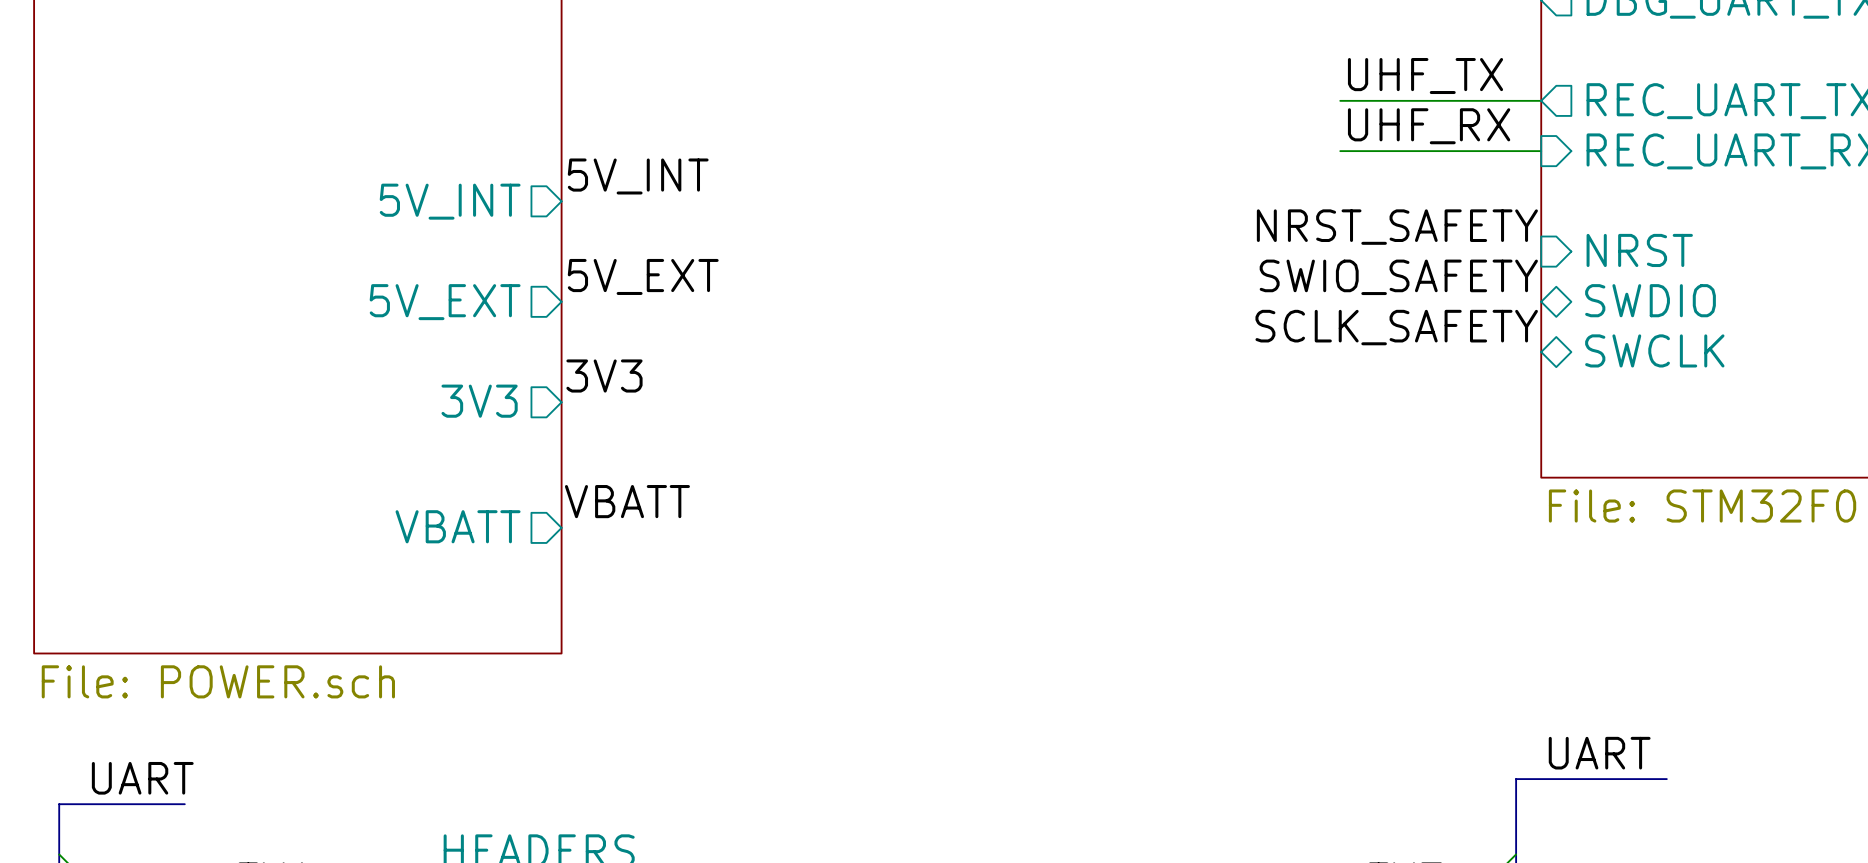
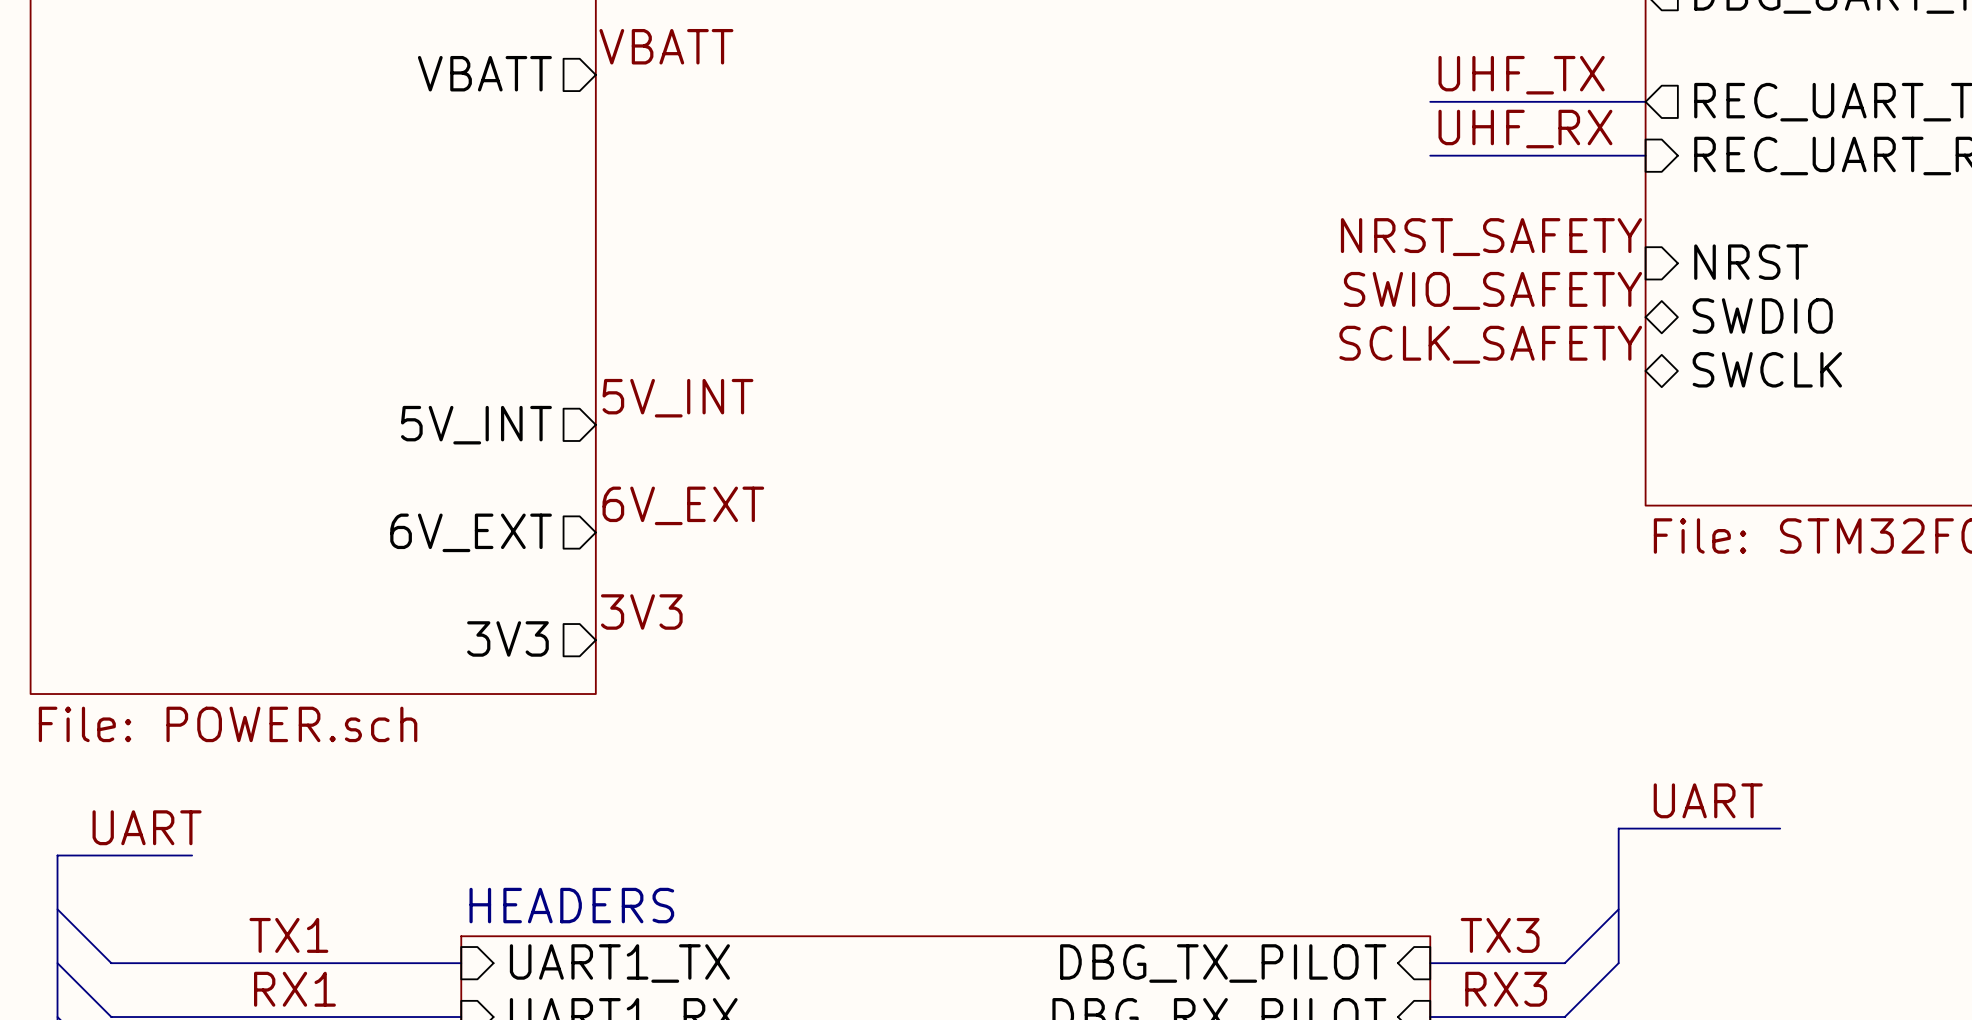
label: 5V_INT (638, 176) -> none
sheet pin: 5V_INT (450, 201) -> none
label: 5V_EXT (643, 276) -> none
sheet pin: 5V_EXT (445, 302) -> none
label: 3V3 (604, 376) -> 5V_INT (677, 398)
sheet pin: 3V3 (479, 401) -> 5V_INT (476, 425)
label: none -> 6V_EXT (683, 505)
label position: VBATT (627, 501) -> VBATT (666, 46)
sheet pin: none -> 6V_EXT (471, 532)
sheet pin position: VBATT (458, 526) -> VBATT (484, 73)
label: none -> 3V3 (641, 611)
sheet pin: none -> 3V3 (507, 638)

